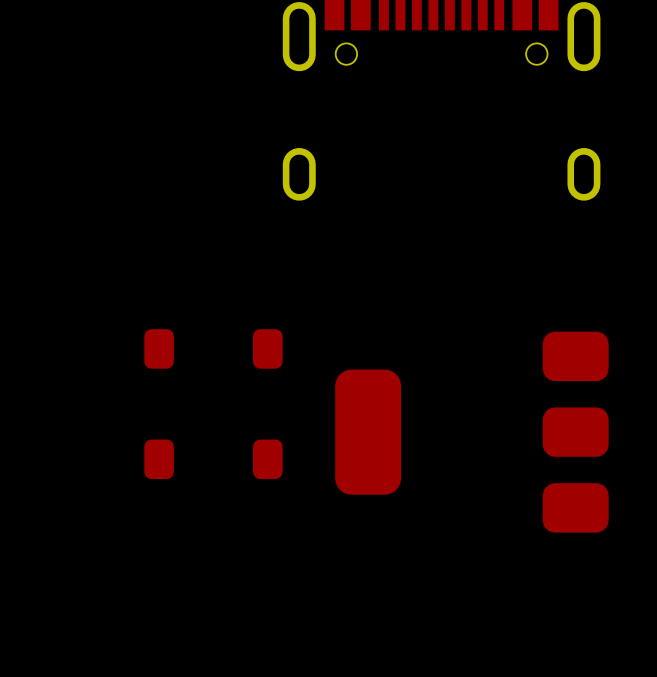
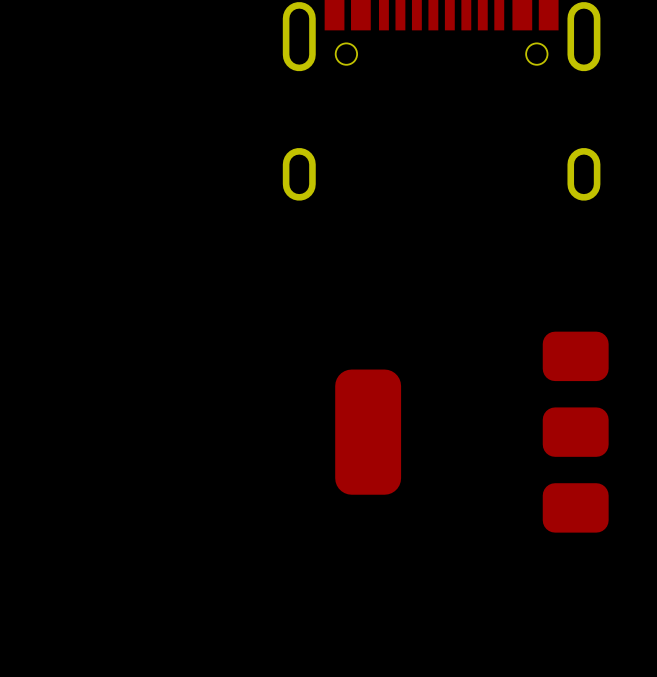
part: (213, 348) -> none
part: (213, 459) -> none

